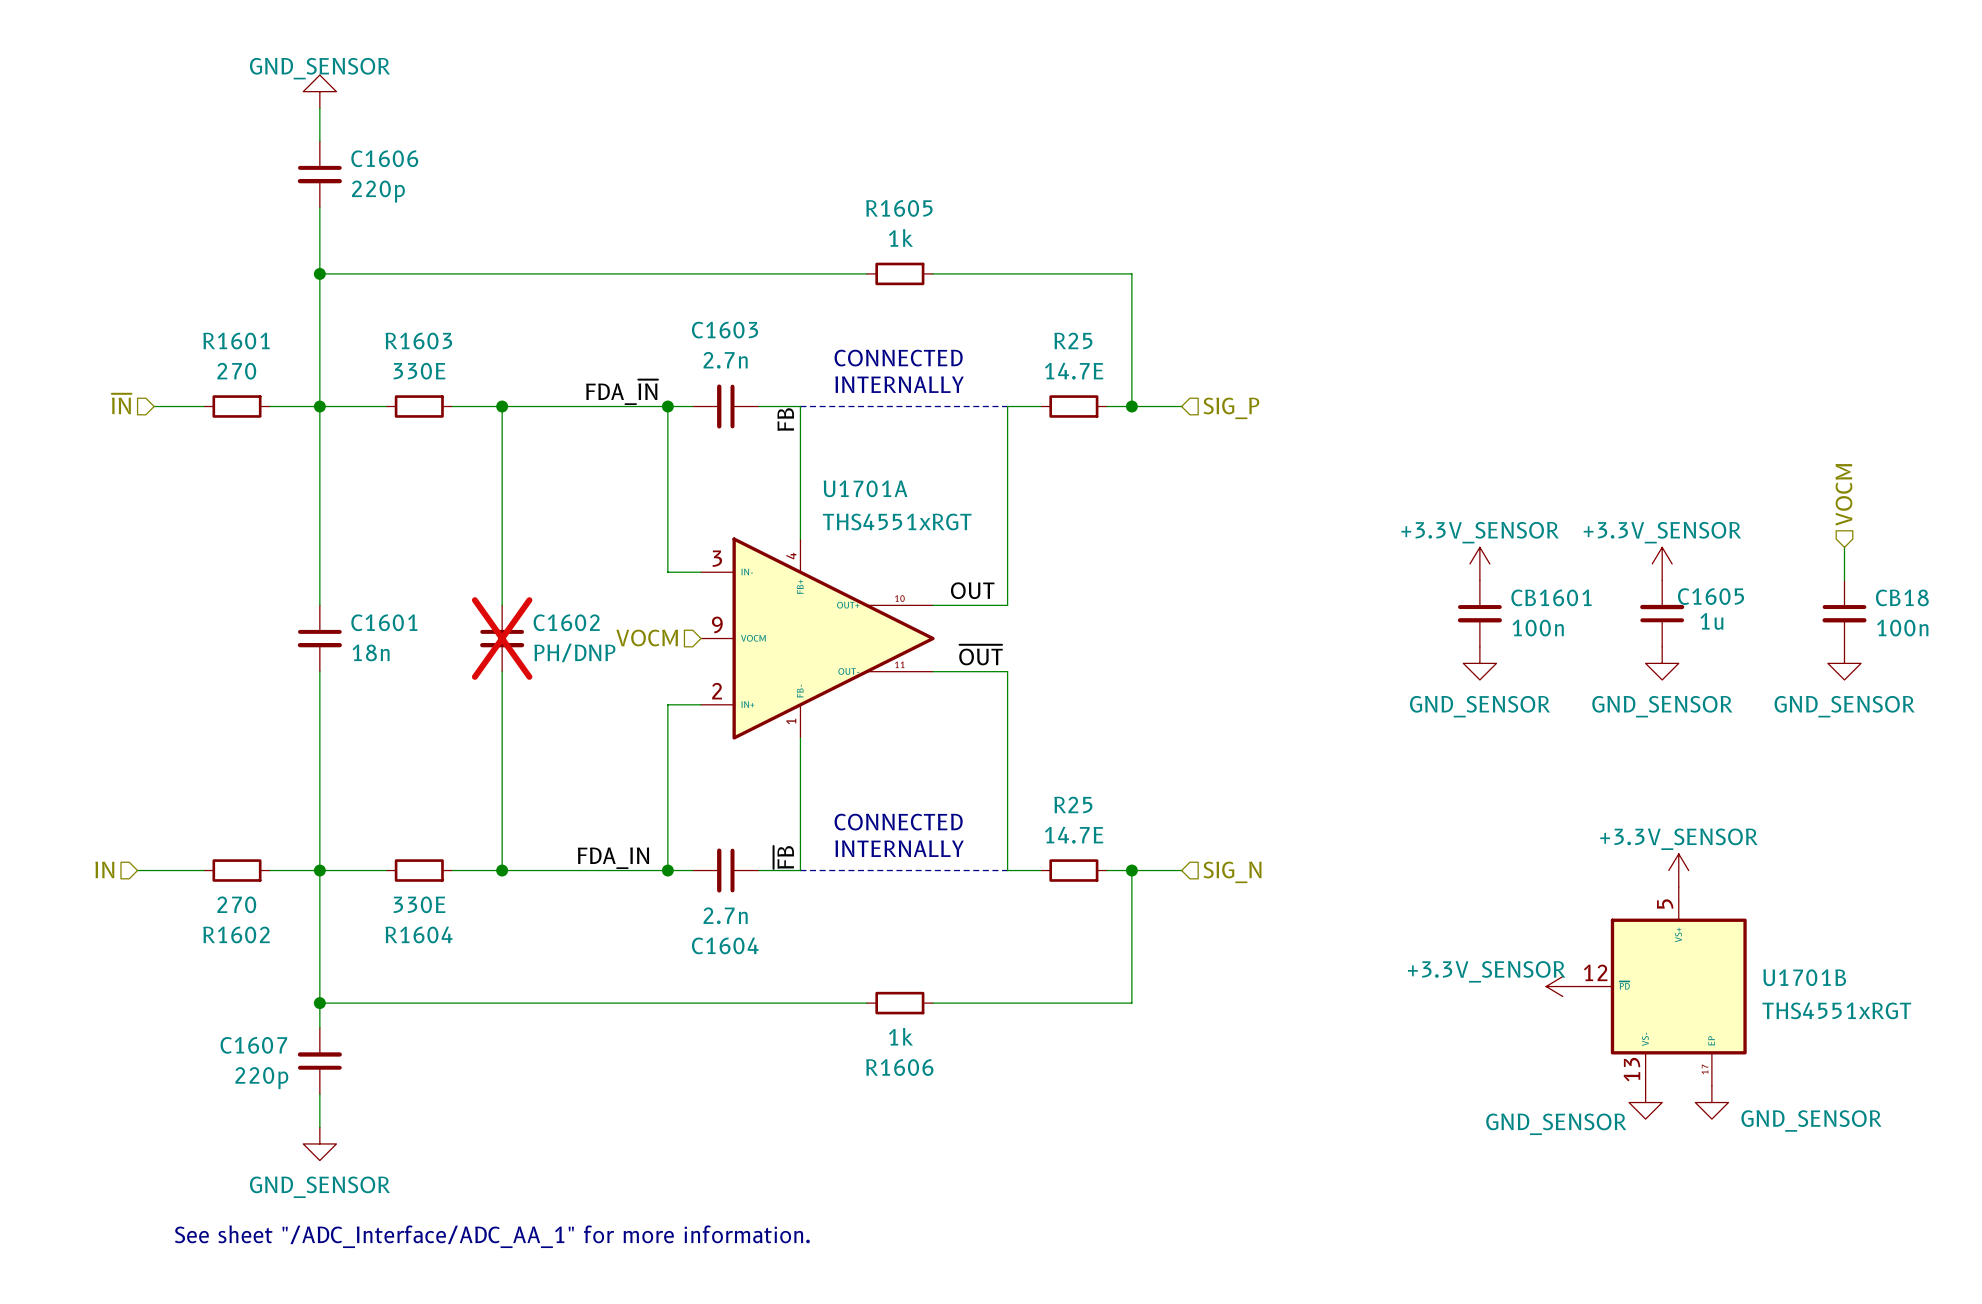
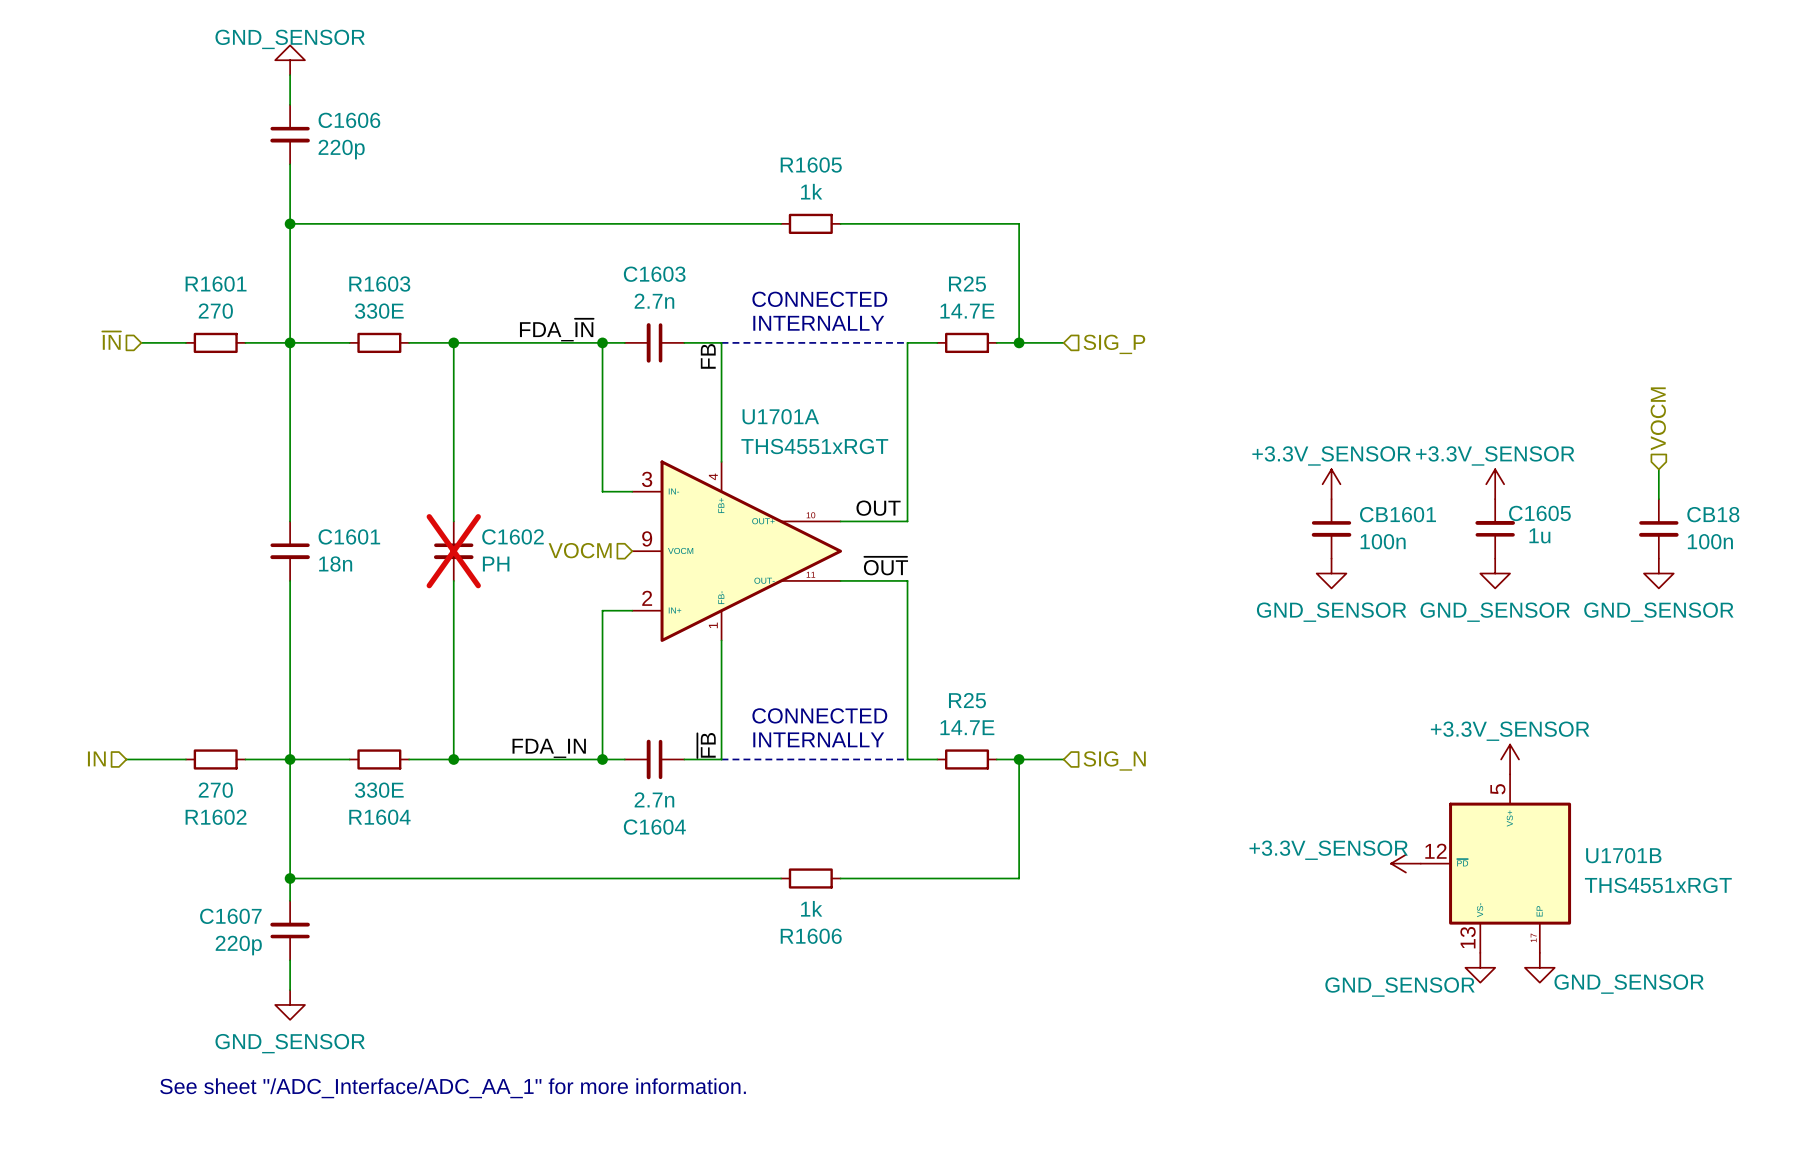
C1602 value: PH/DNP (574, 652) -> PH (496, 564)

